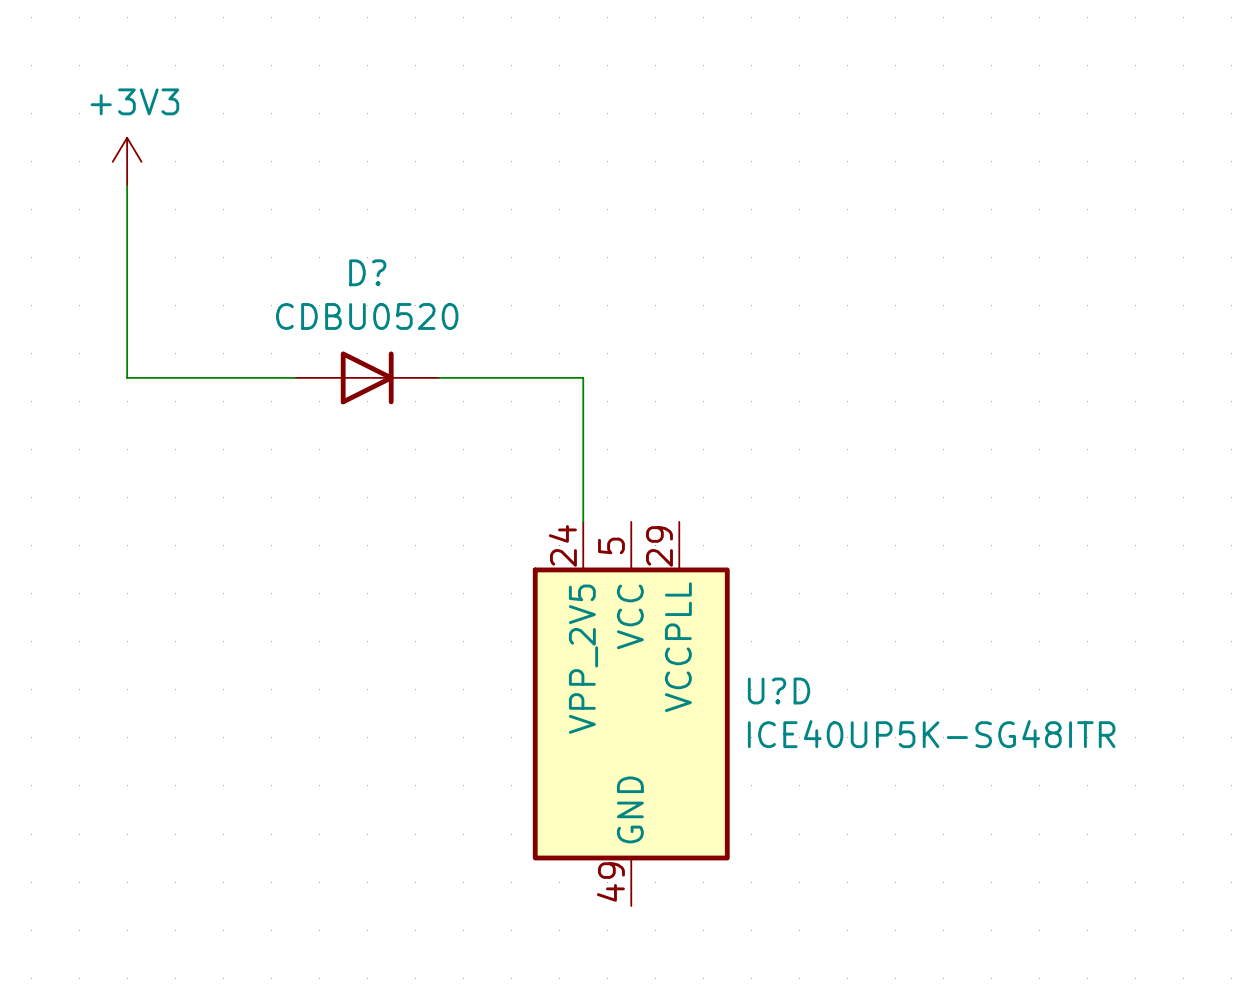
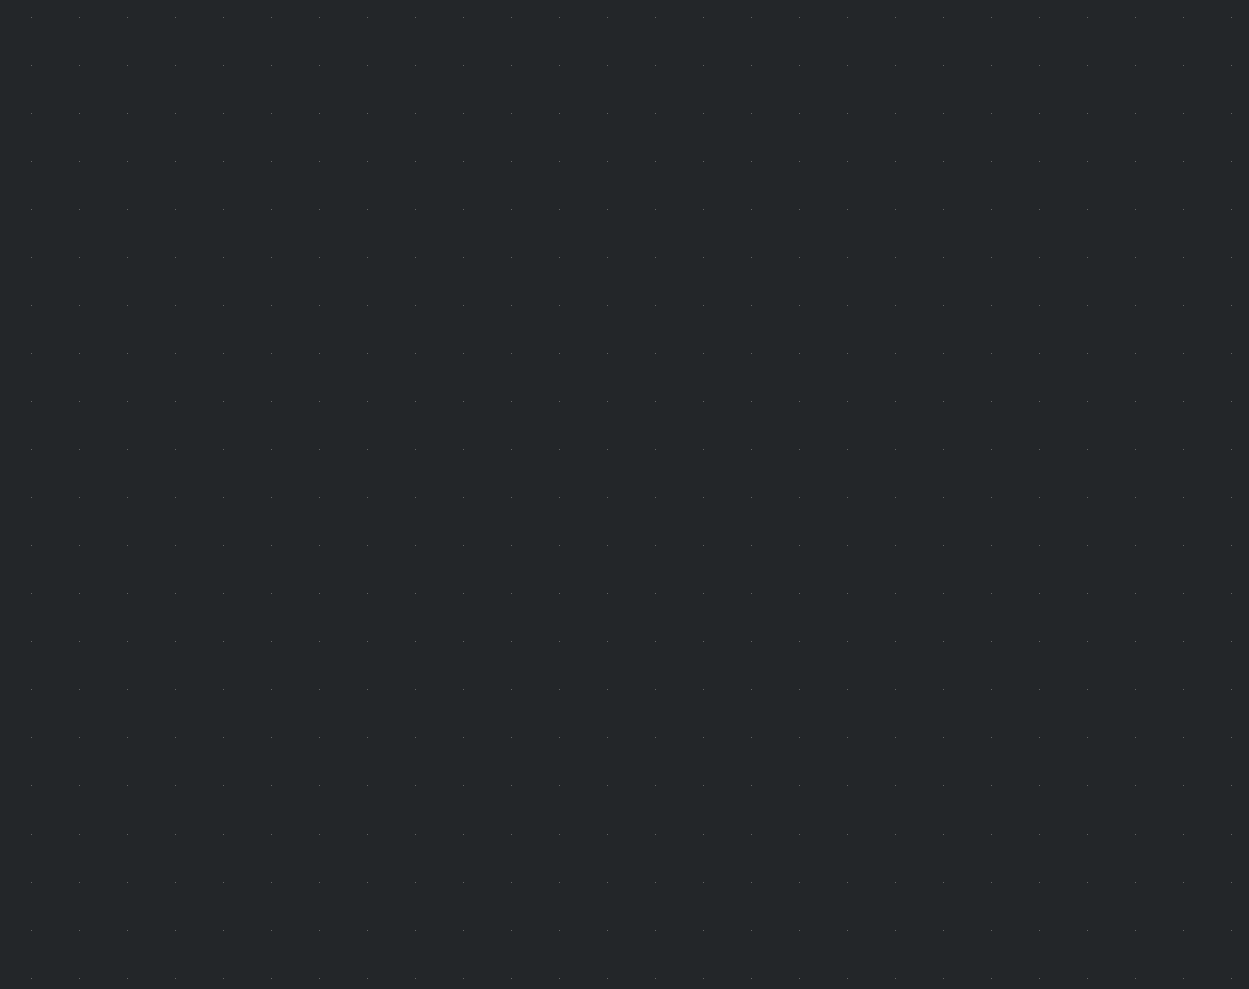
power symbol: +3V3 (127, 161) -> none
wire: (127, 185) (127, 377) (295, 377) -> none
D?: CDBU0520 (367, 377) -> none
wire: (439, 377) (583, 377) (583, 521) -> none
U?D: ICE40UP5K-SG48ITR (631, 713) -> none

